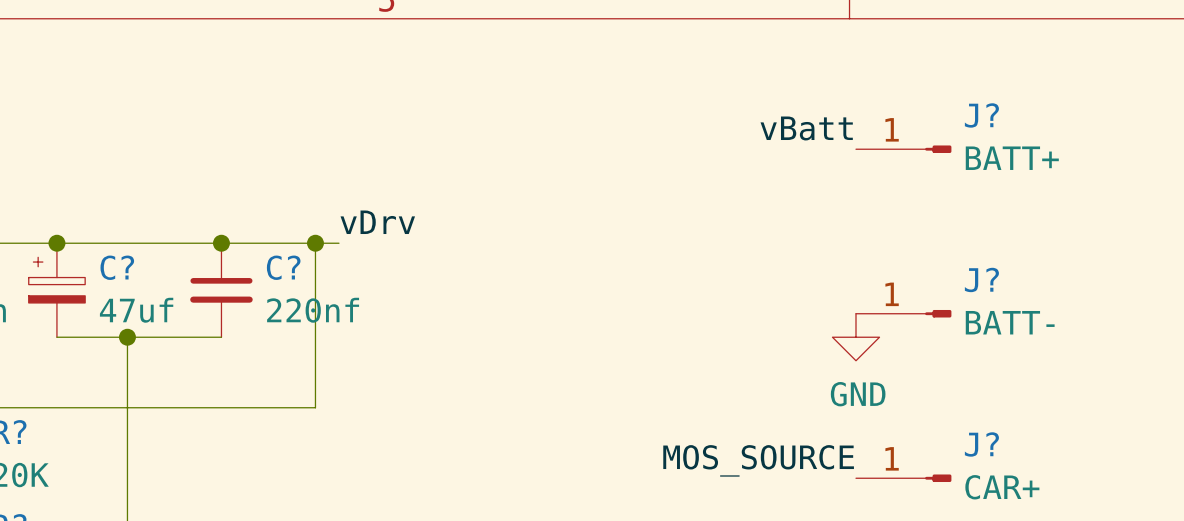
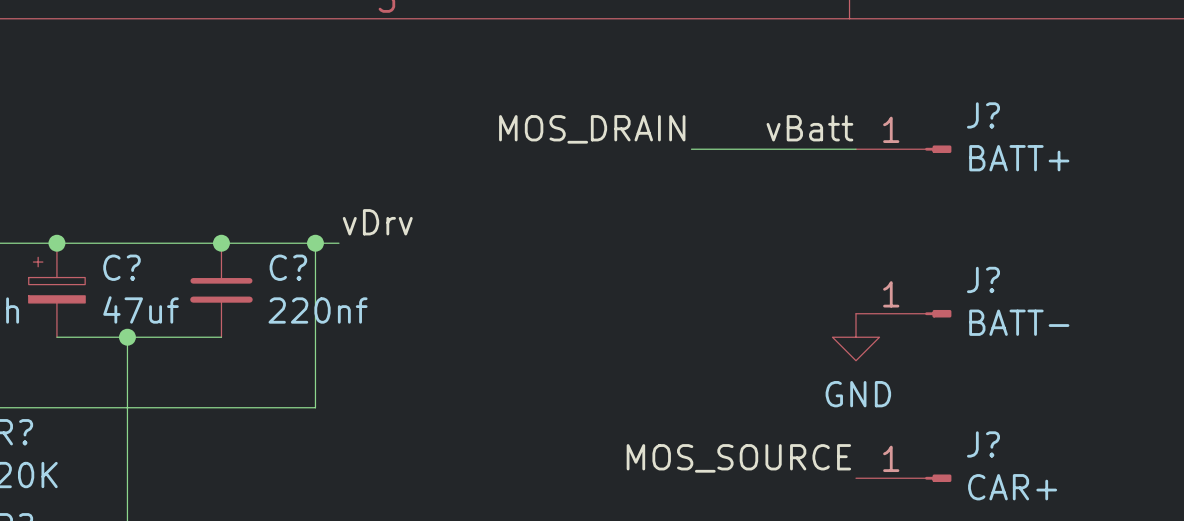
label: none -> MOS_DRAIN (592, 129)
wire: none -> (691, 149) (856, 149)

